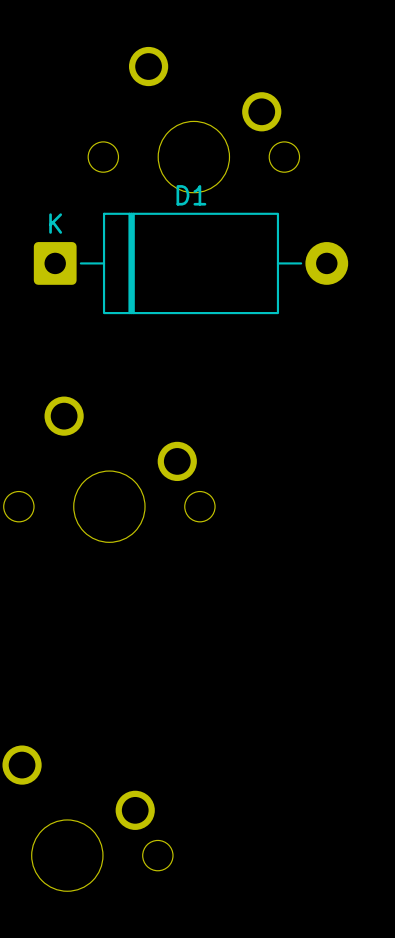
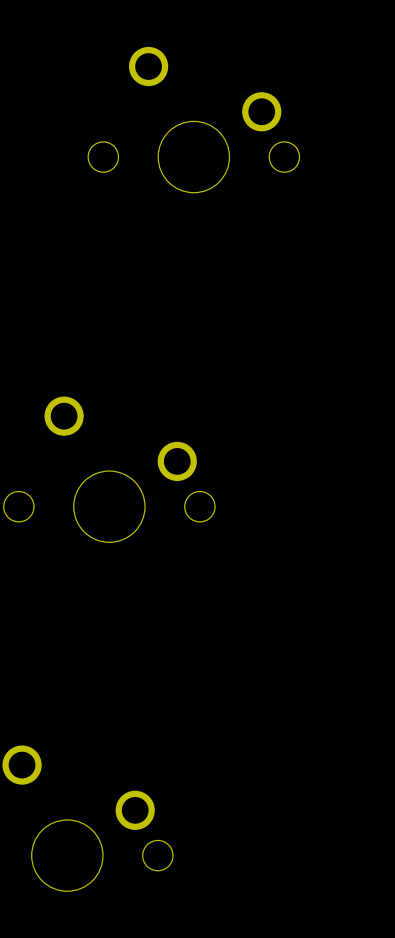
D1: (191, 263) -> none

